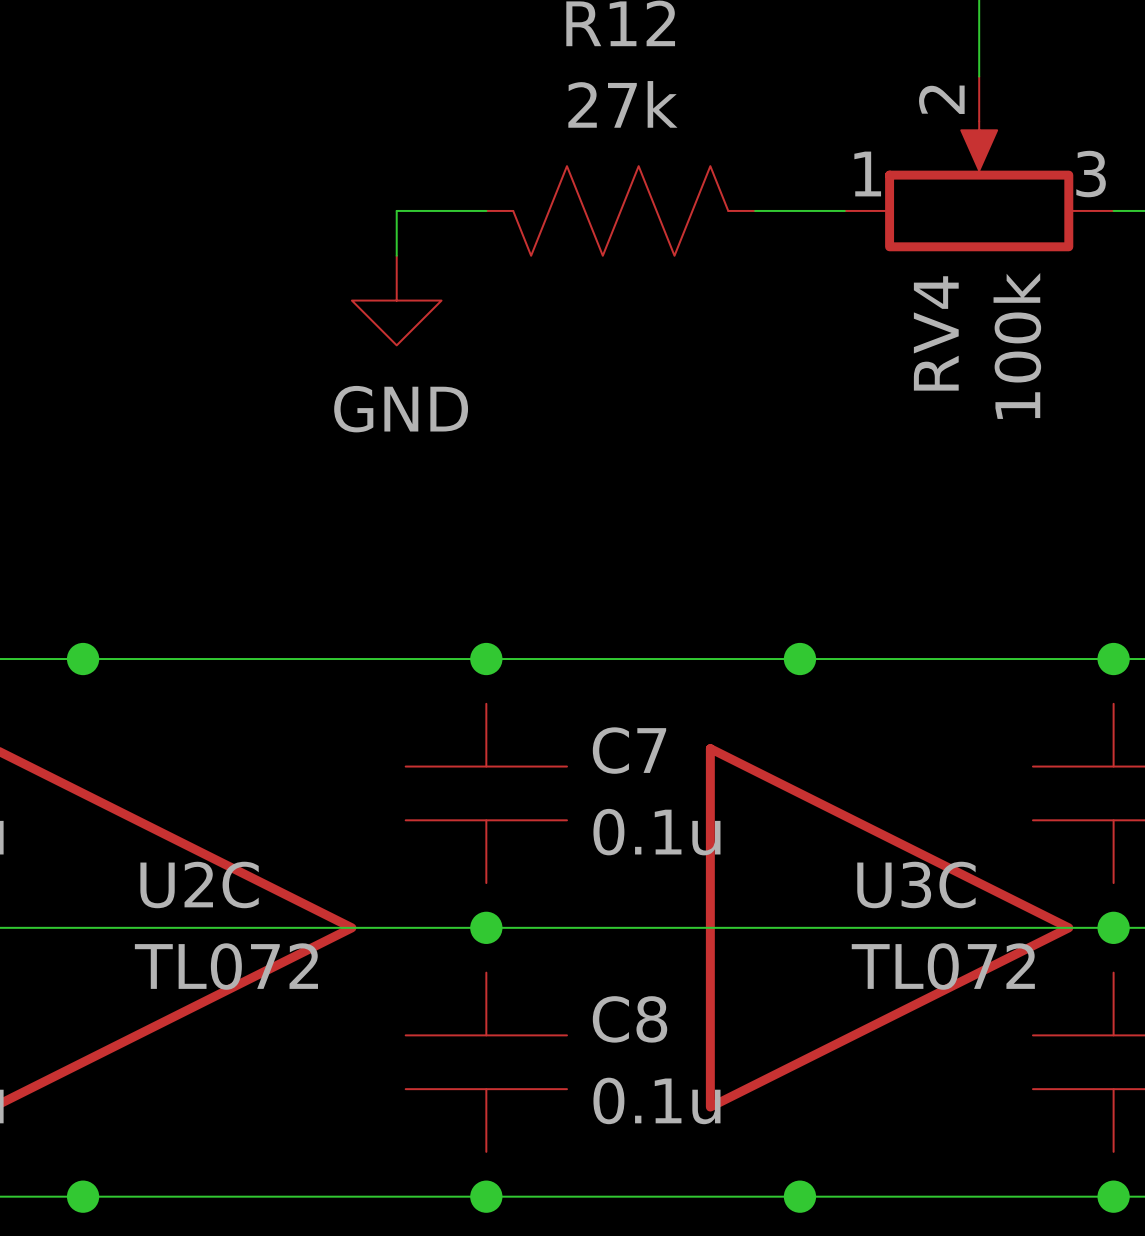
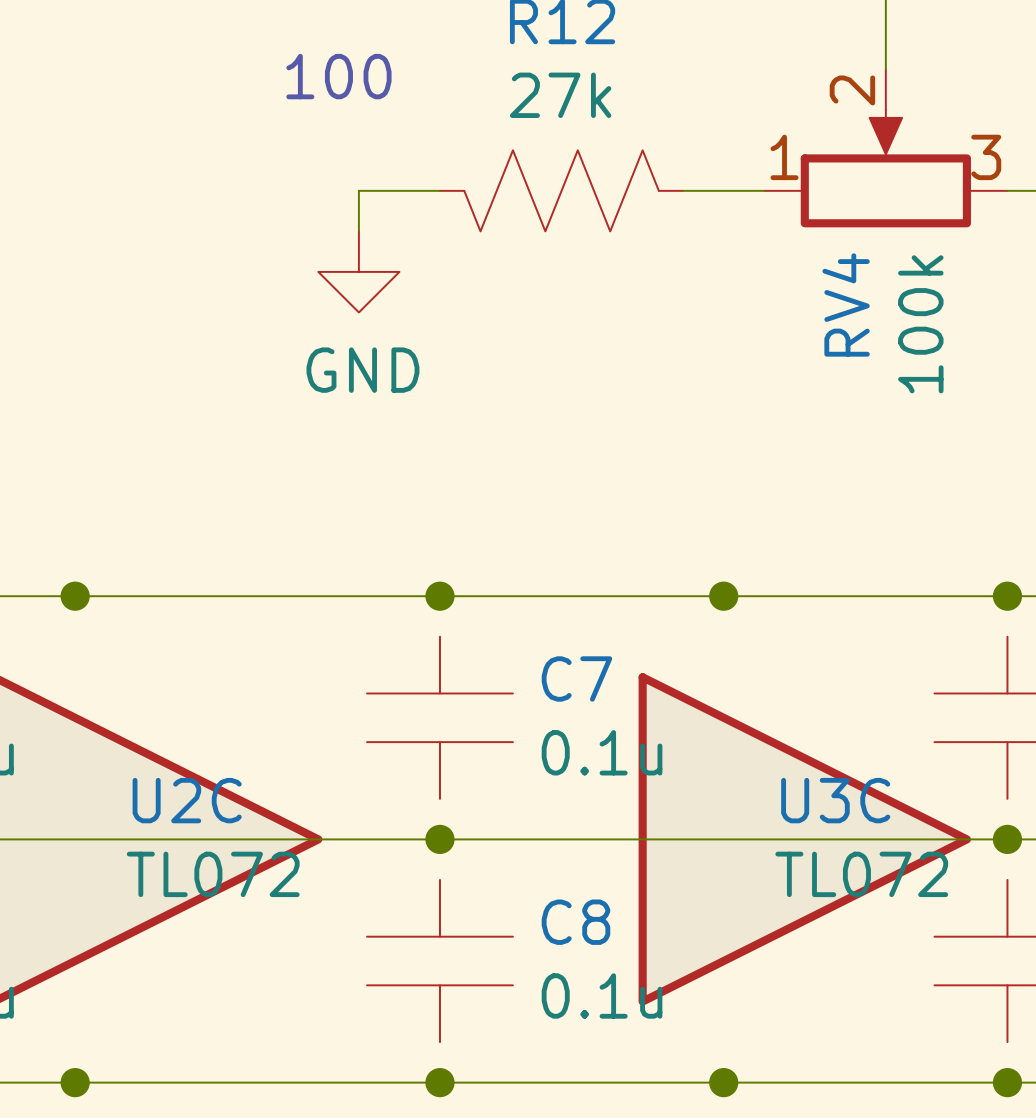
text: none -> 100 (338, 76)

